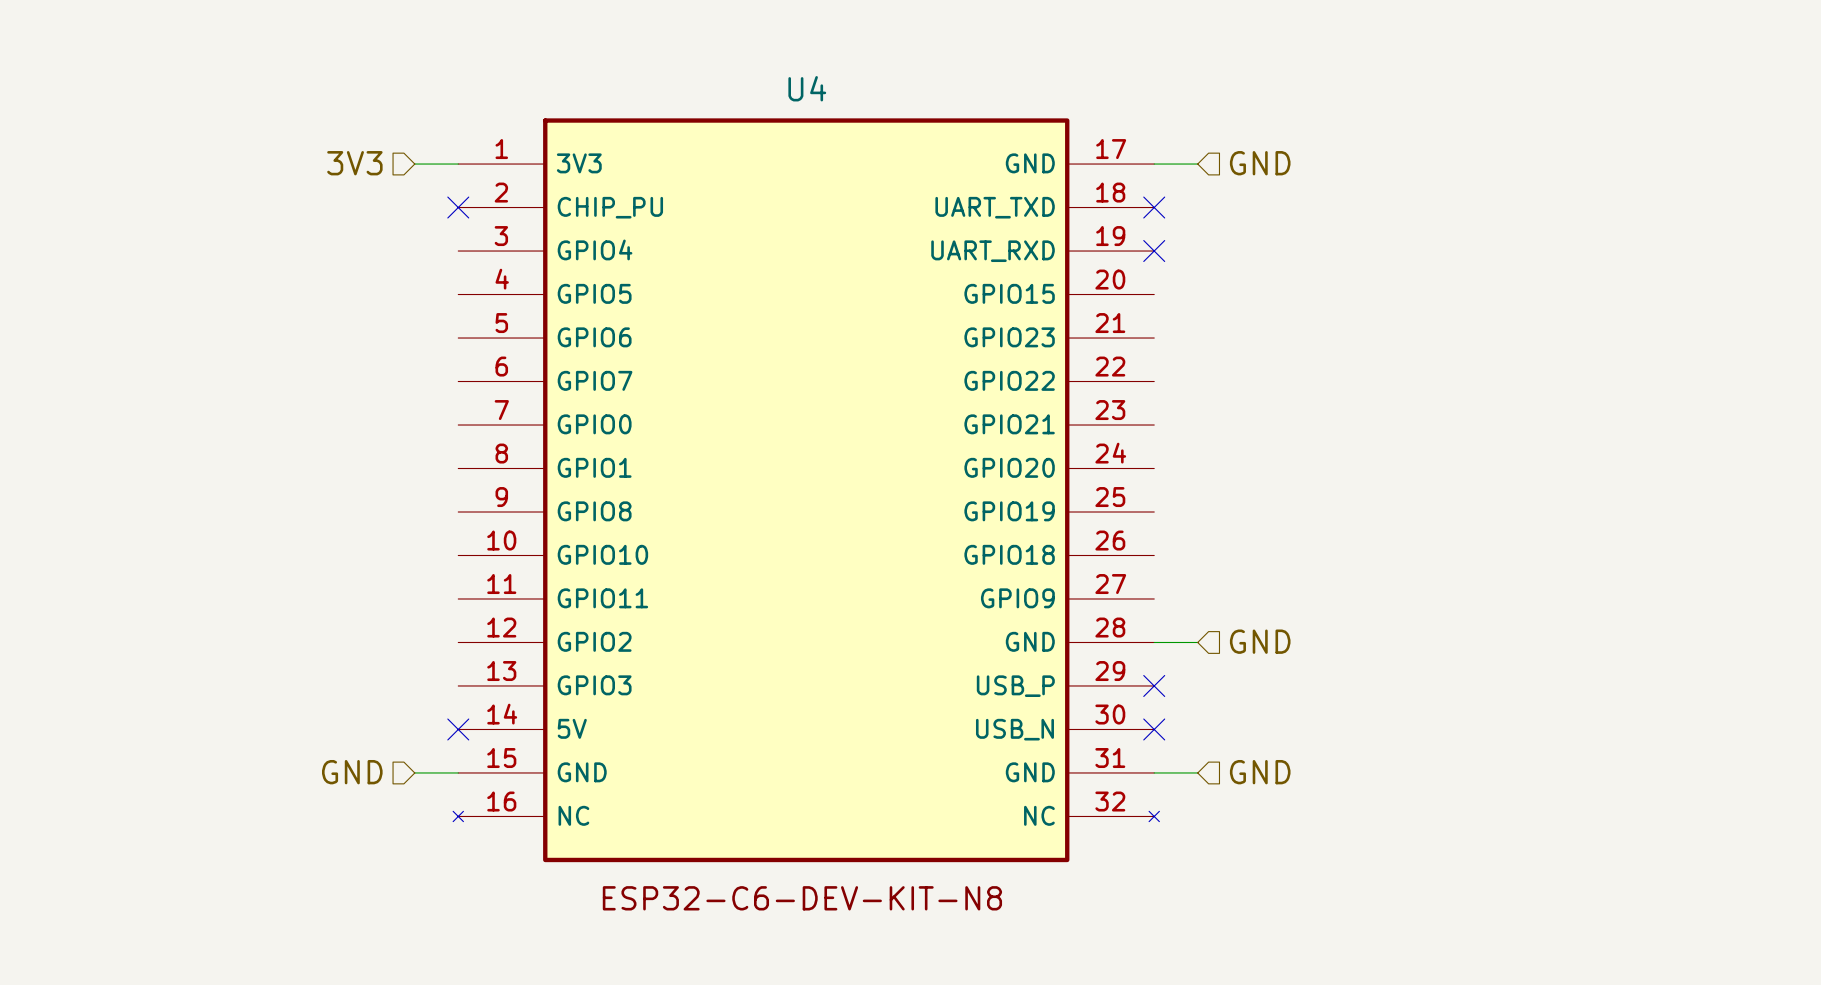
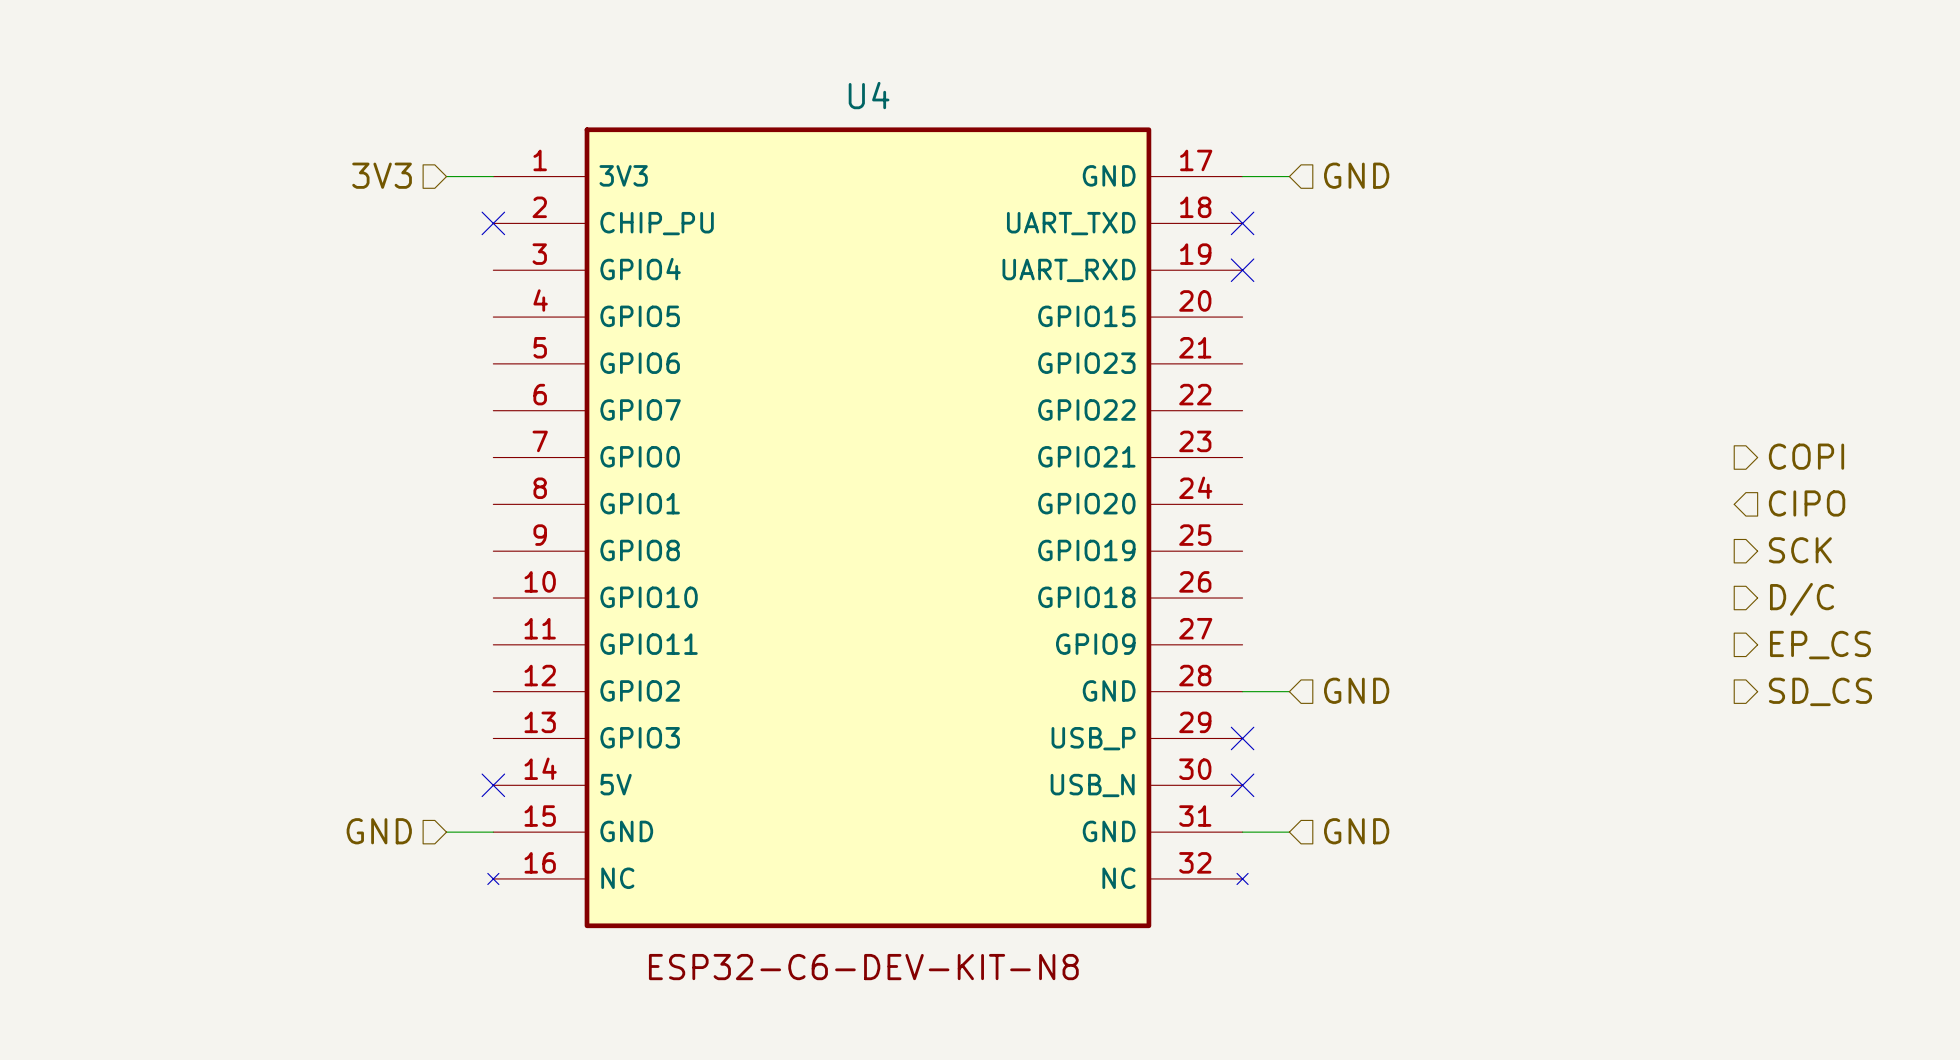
hierarchical label: none -> COPI (1806, 456)
hierarchical label: none -> CIPO (1807, 503)
hierarchical label: none -> SCK (1800, 550)
hierarchical label: none -> D/C (1802, 599)
hierarchical label: none -> EP_CS (1820, 645)
hierarchical label: none -> SD_CS (1820, 691)

